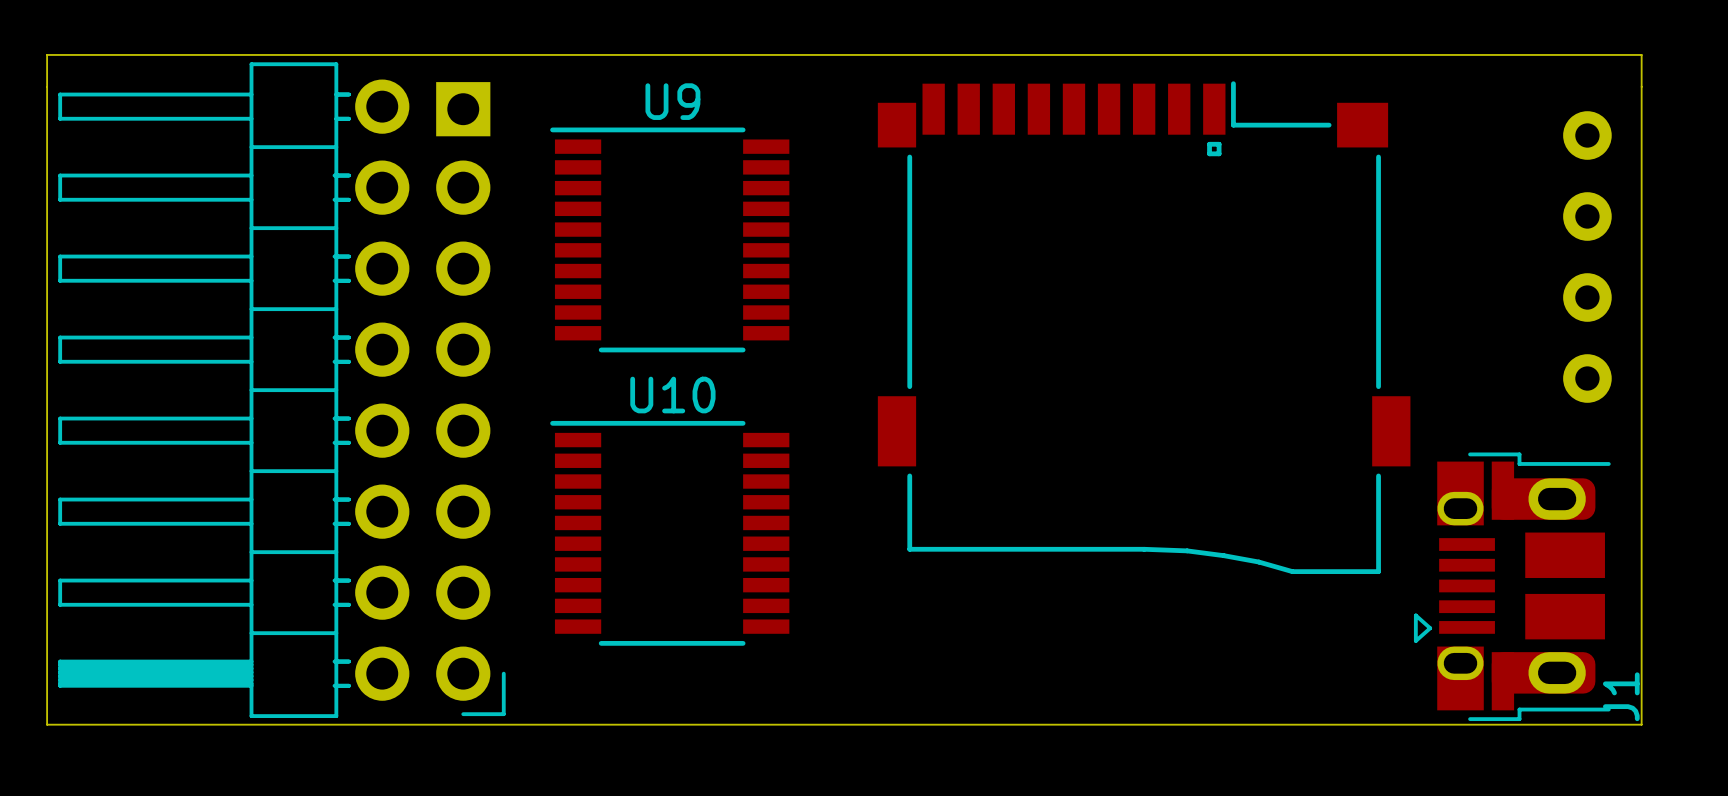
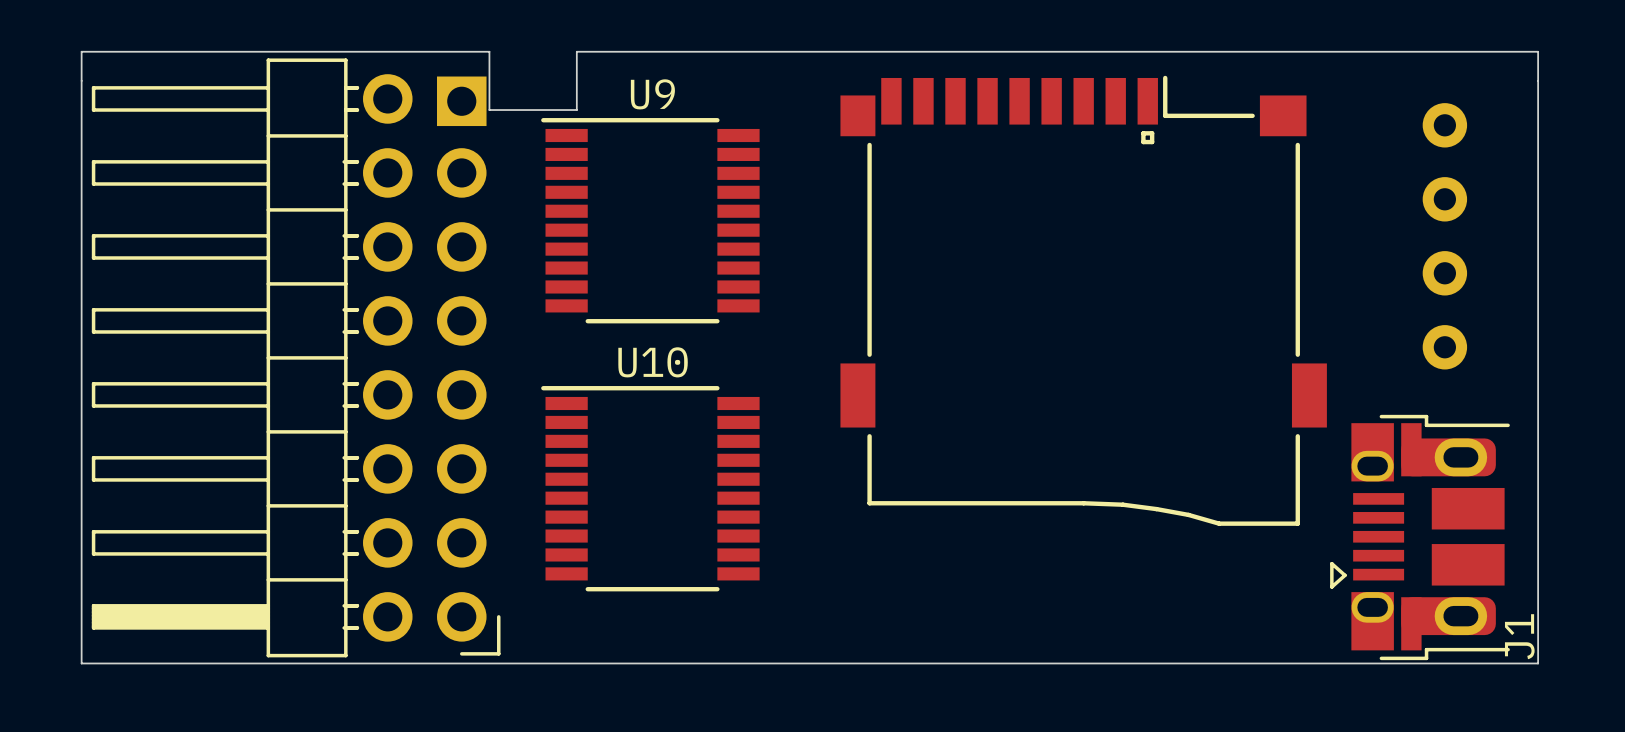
board edge: (493, 54) (589, 54) -> (489, 51) (489, 110) (576, 110) (576, 51)
part position: (1587, 257) -> (1444, 236)

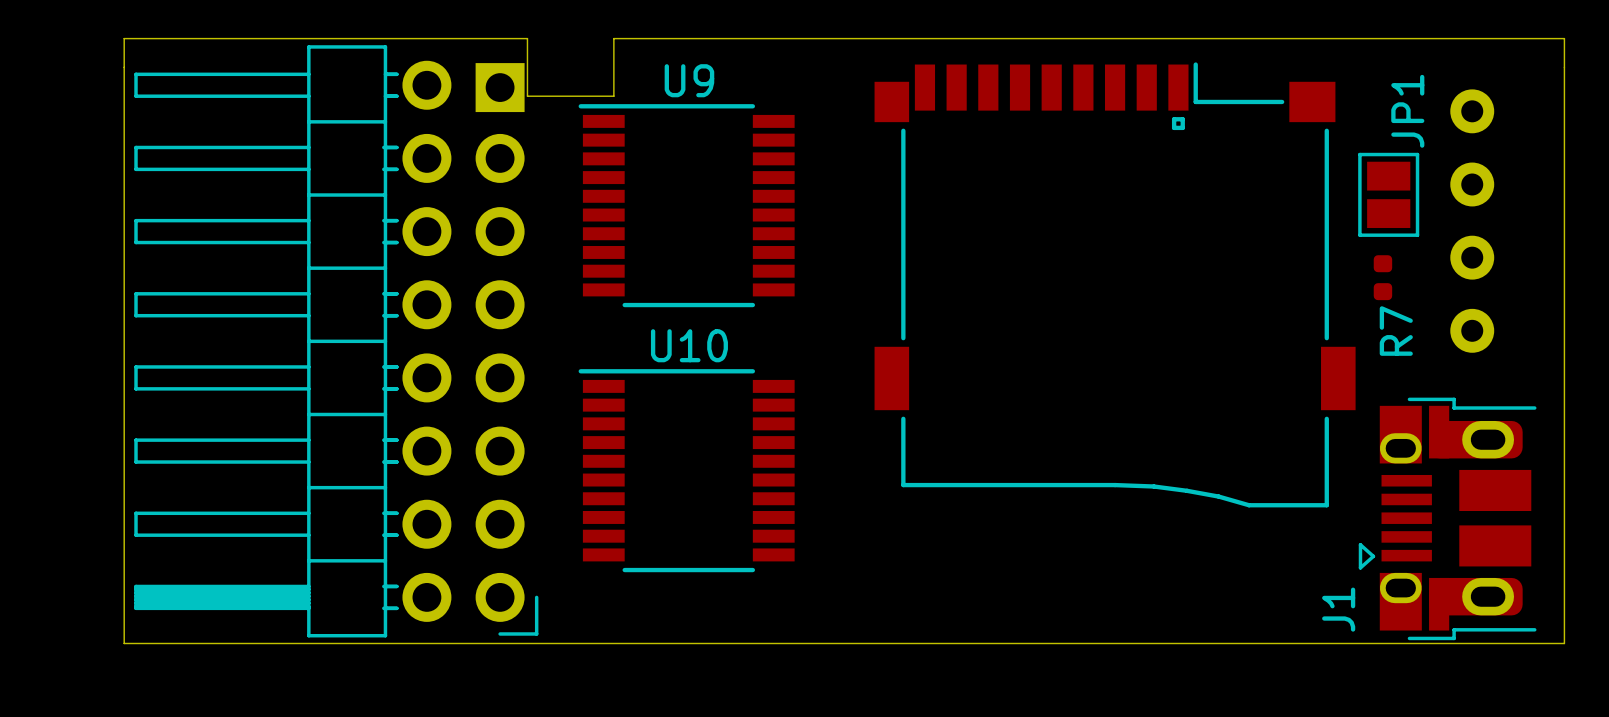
JP1: none -> (1388, 194)
R7: none -> (1382, 277)
J1 name position: J1 (1519, 636) -> J1 (1338, 609)

